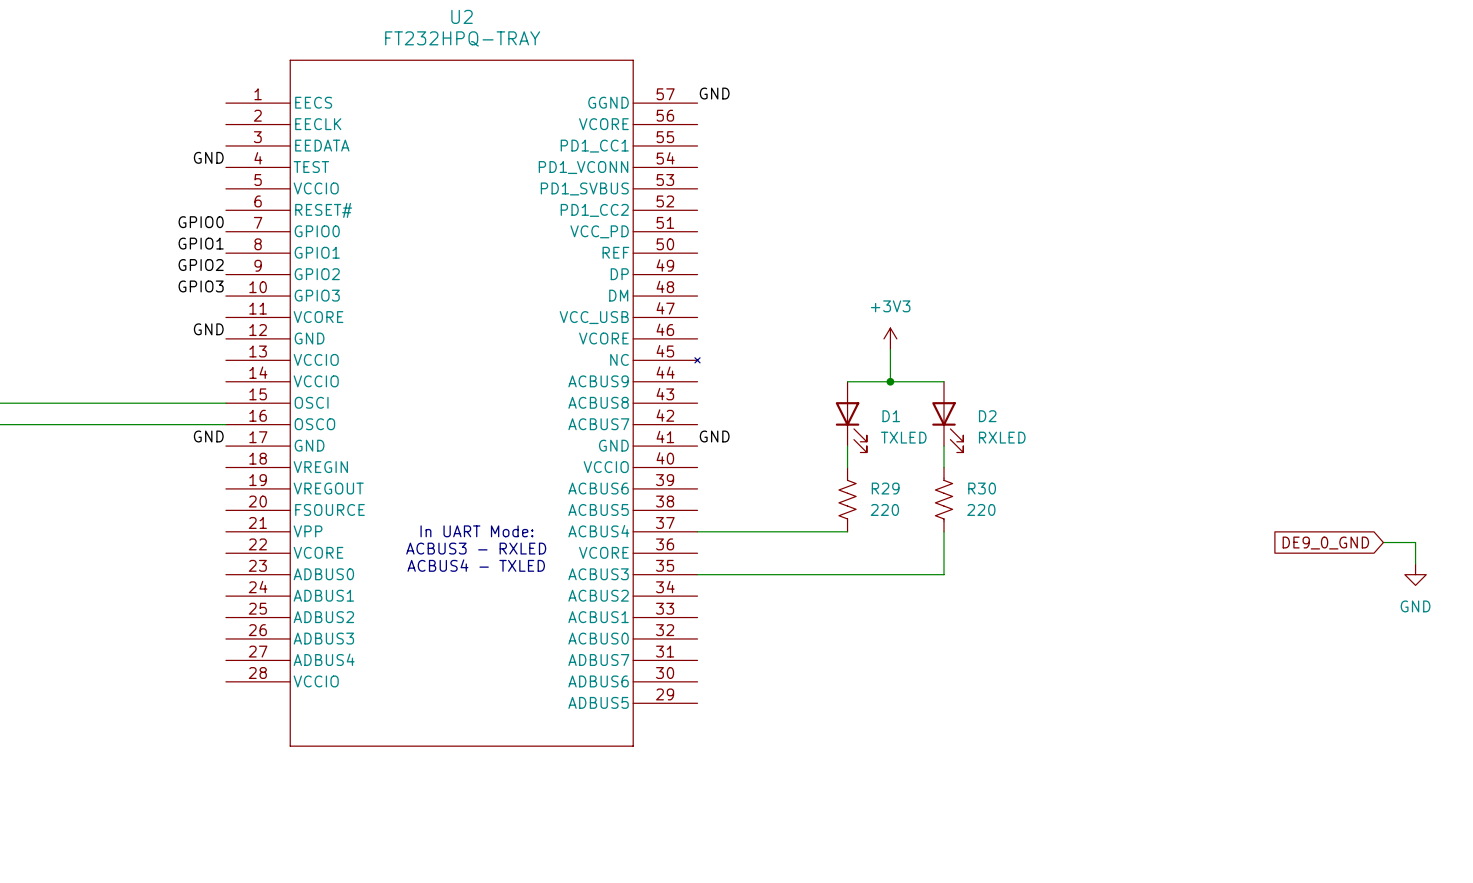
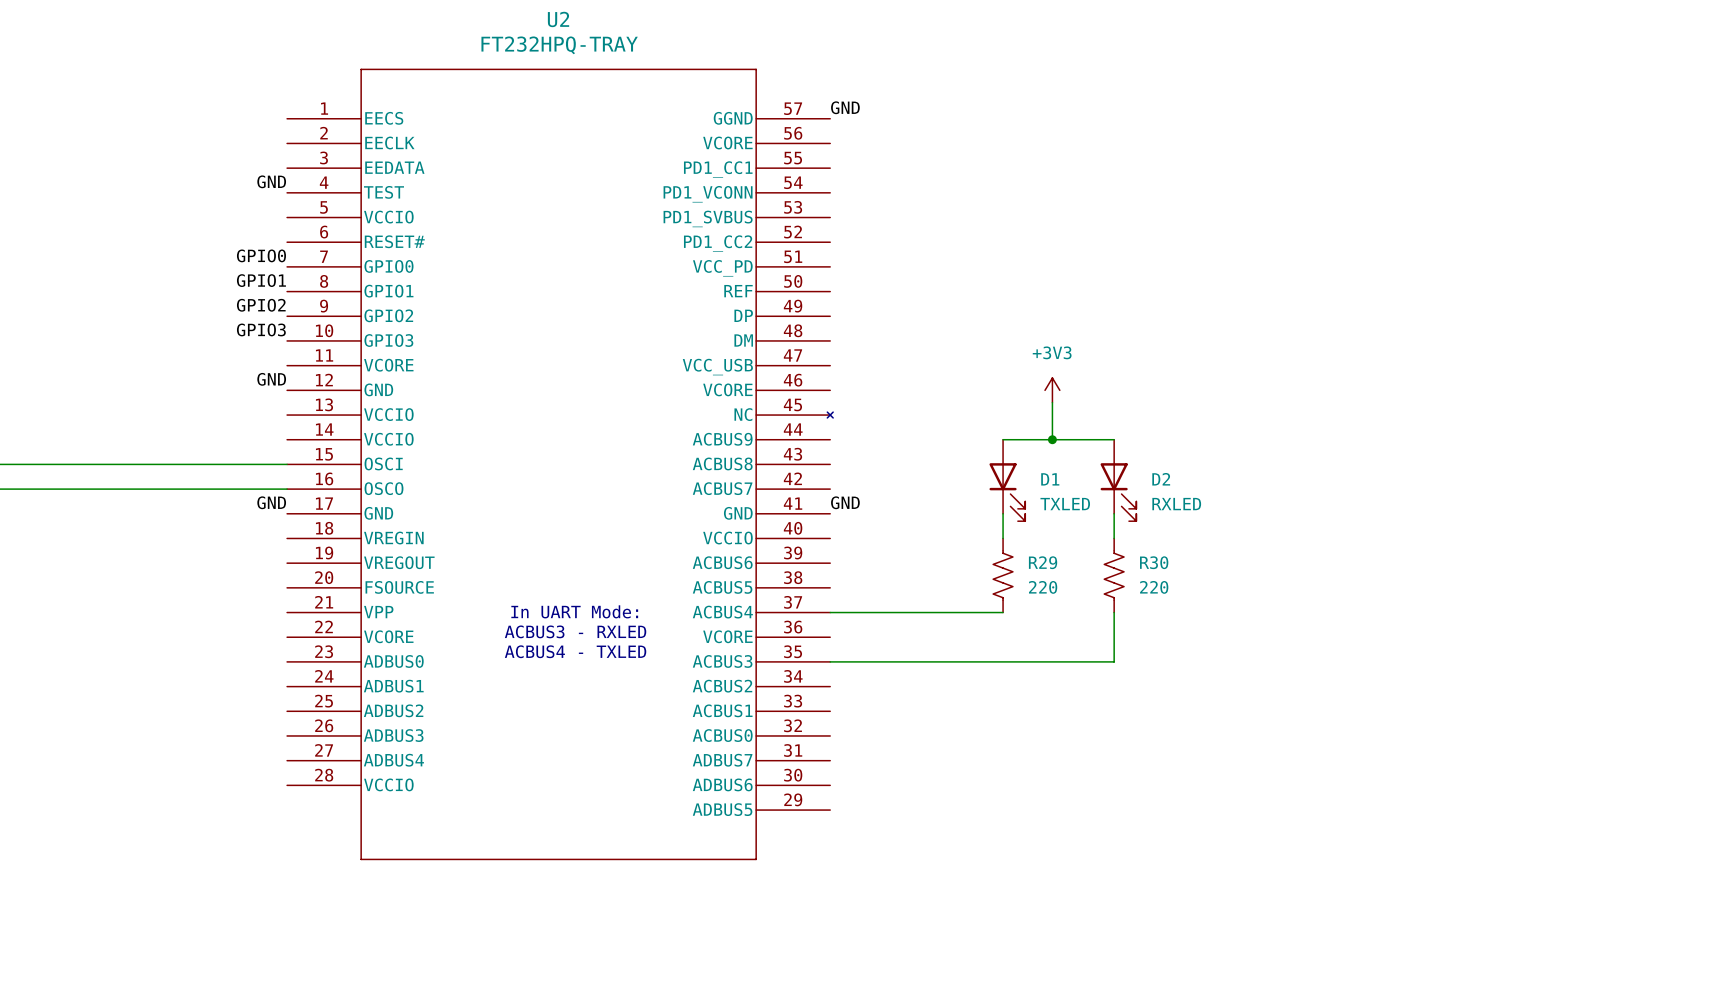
wire: (1383, 542) (1415, 542) (1415, 563) -> none
global label: DE9_0_GND (1325, 543) -> none
power symbol: GND (1415, 574) -> none

